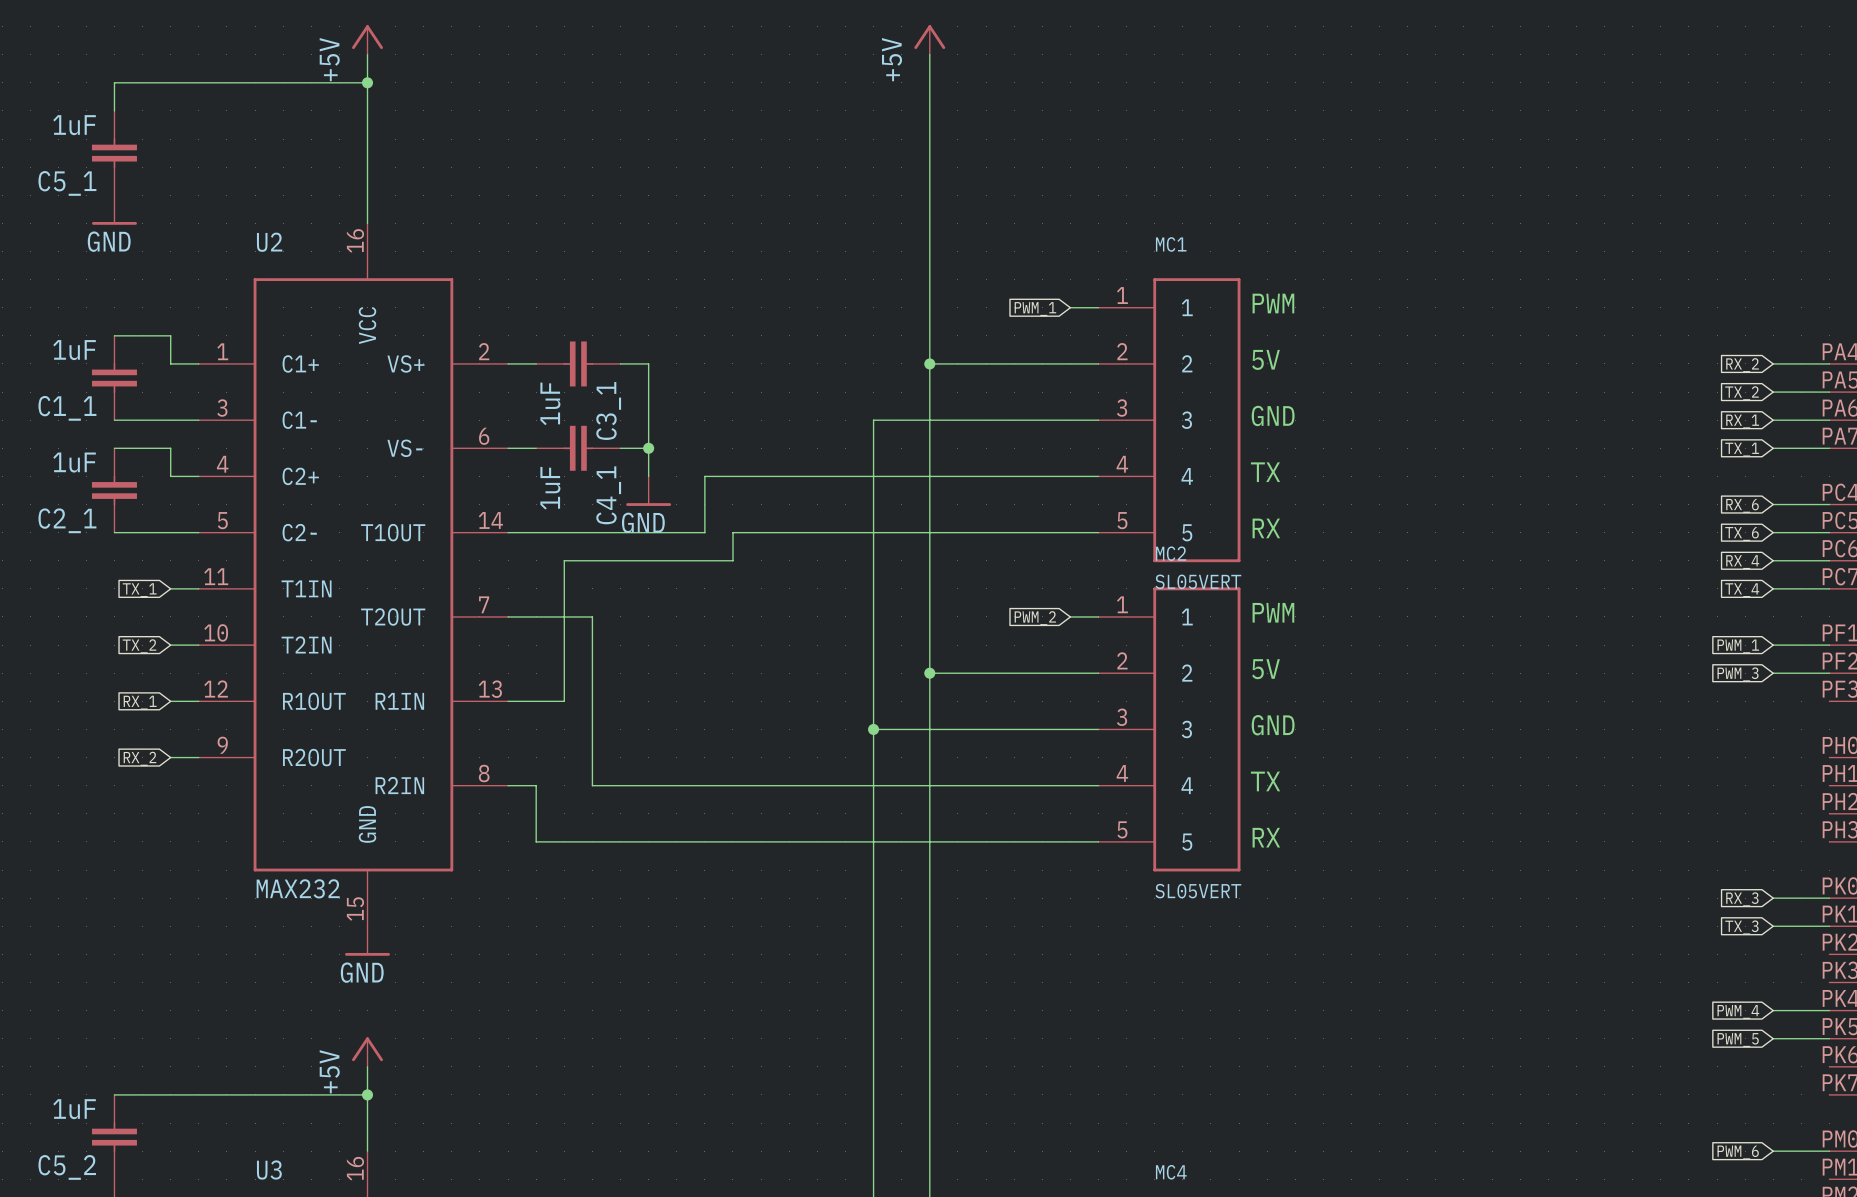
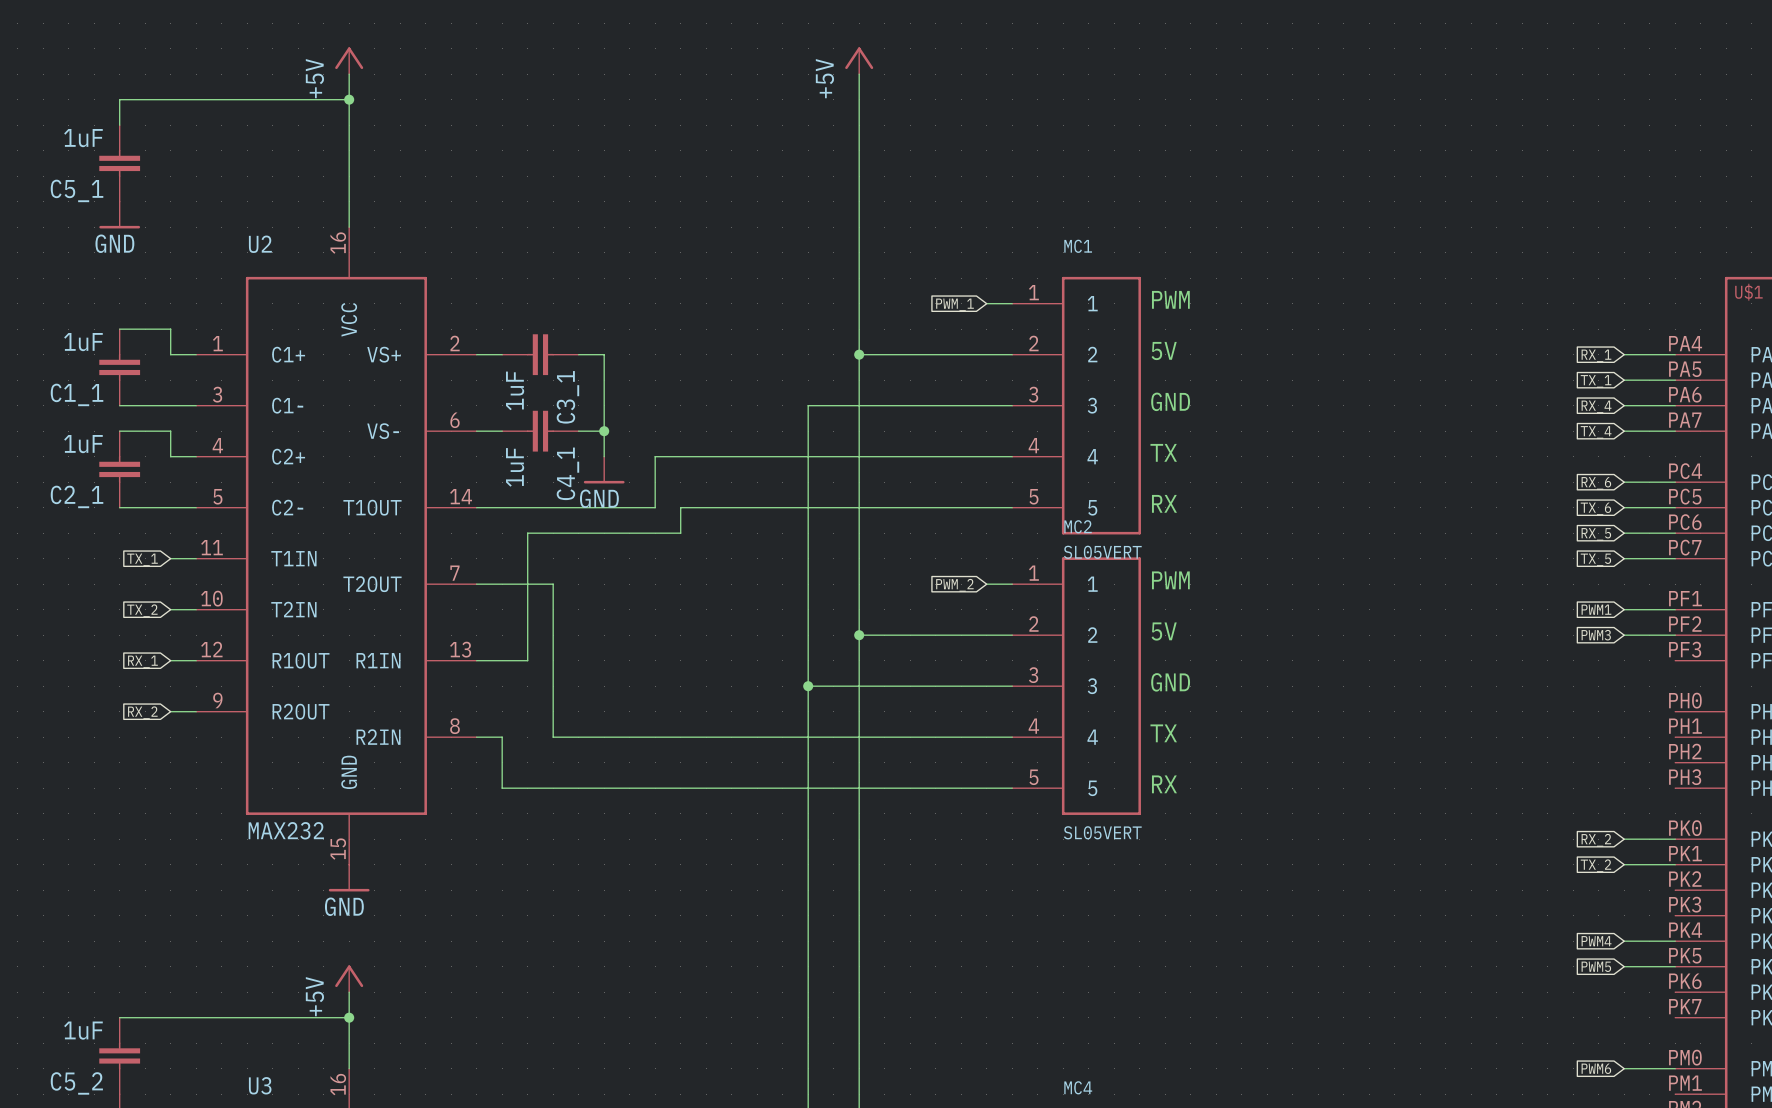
global label: RX_2 (1742, 365) -> RX_1 (1596, 355)
global label: TX_2 (1742, 393) -> TX_1 (1596, 381)
global label: RX_1 (1742, 421) -> RX_4 (1596, 406)
global label: TX_1 (1742, 449) -> TX_4 (1596, 432)
global label: RX_4 (1742, 562) -> RX_5 (1596, 534)
global label: TX_4 (1742, 590) -> TX_5 (1595, 559)
global label: PWM_1 (1738, 646) -> PWM1 (1596, 609)
global label: PWM_3 (1738, 674) -> PWM3 (1596, 635)
global label: RX_3 (1742, 899) -> RX_2 (1596, 840)
global label: TX_3 (1741, 927) -> TX_2 (1595, 865)
global label: PWM_4 (1738, 1011) -> PWM4 (1596, 941)
global label: PWM_5 (1738, 1040) -> PWM5 (1596, 966)
global label: PWM_6 (1738, 1152) -> PWM6 (1596, 1068)

